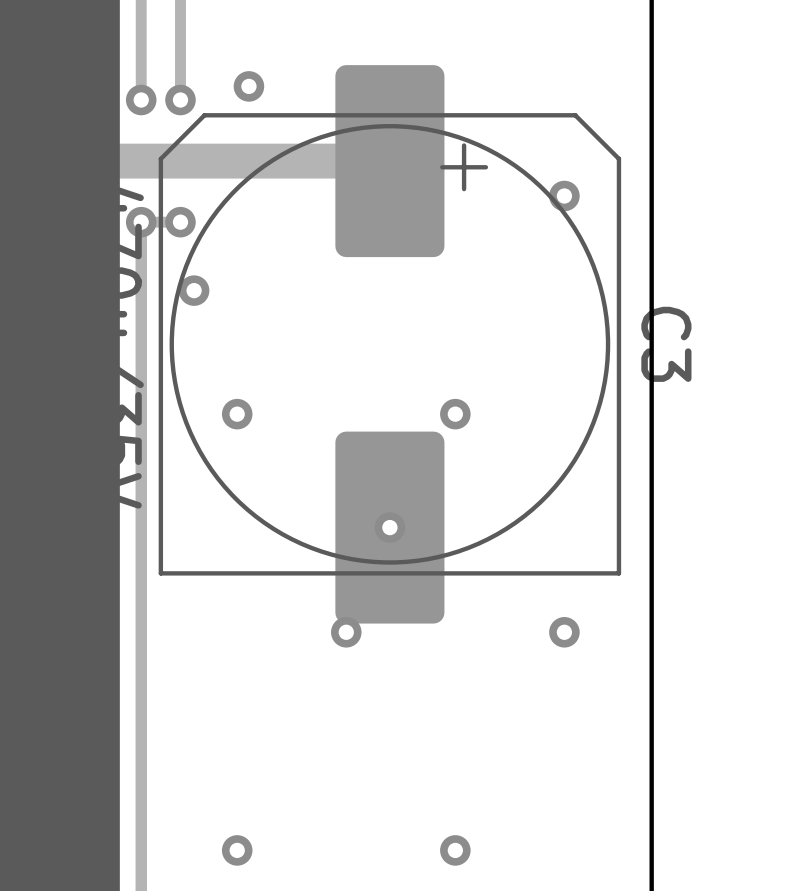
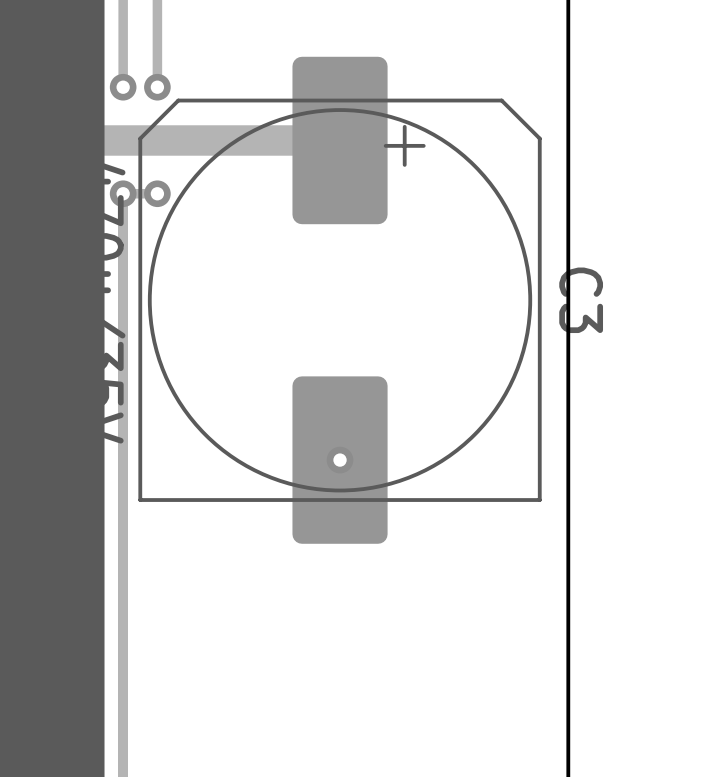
via: (248, 86) -> none
via: (564, 196) -> none
via: (194, 290) -> none
via: (237, 414) -> none
via: (455, 414) -> none
via: (346, 632) -> none
via: (564, 632) -> none
via: (237, 850) -> none
via: (455, 850) -> none

